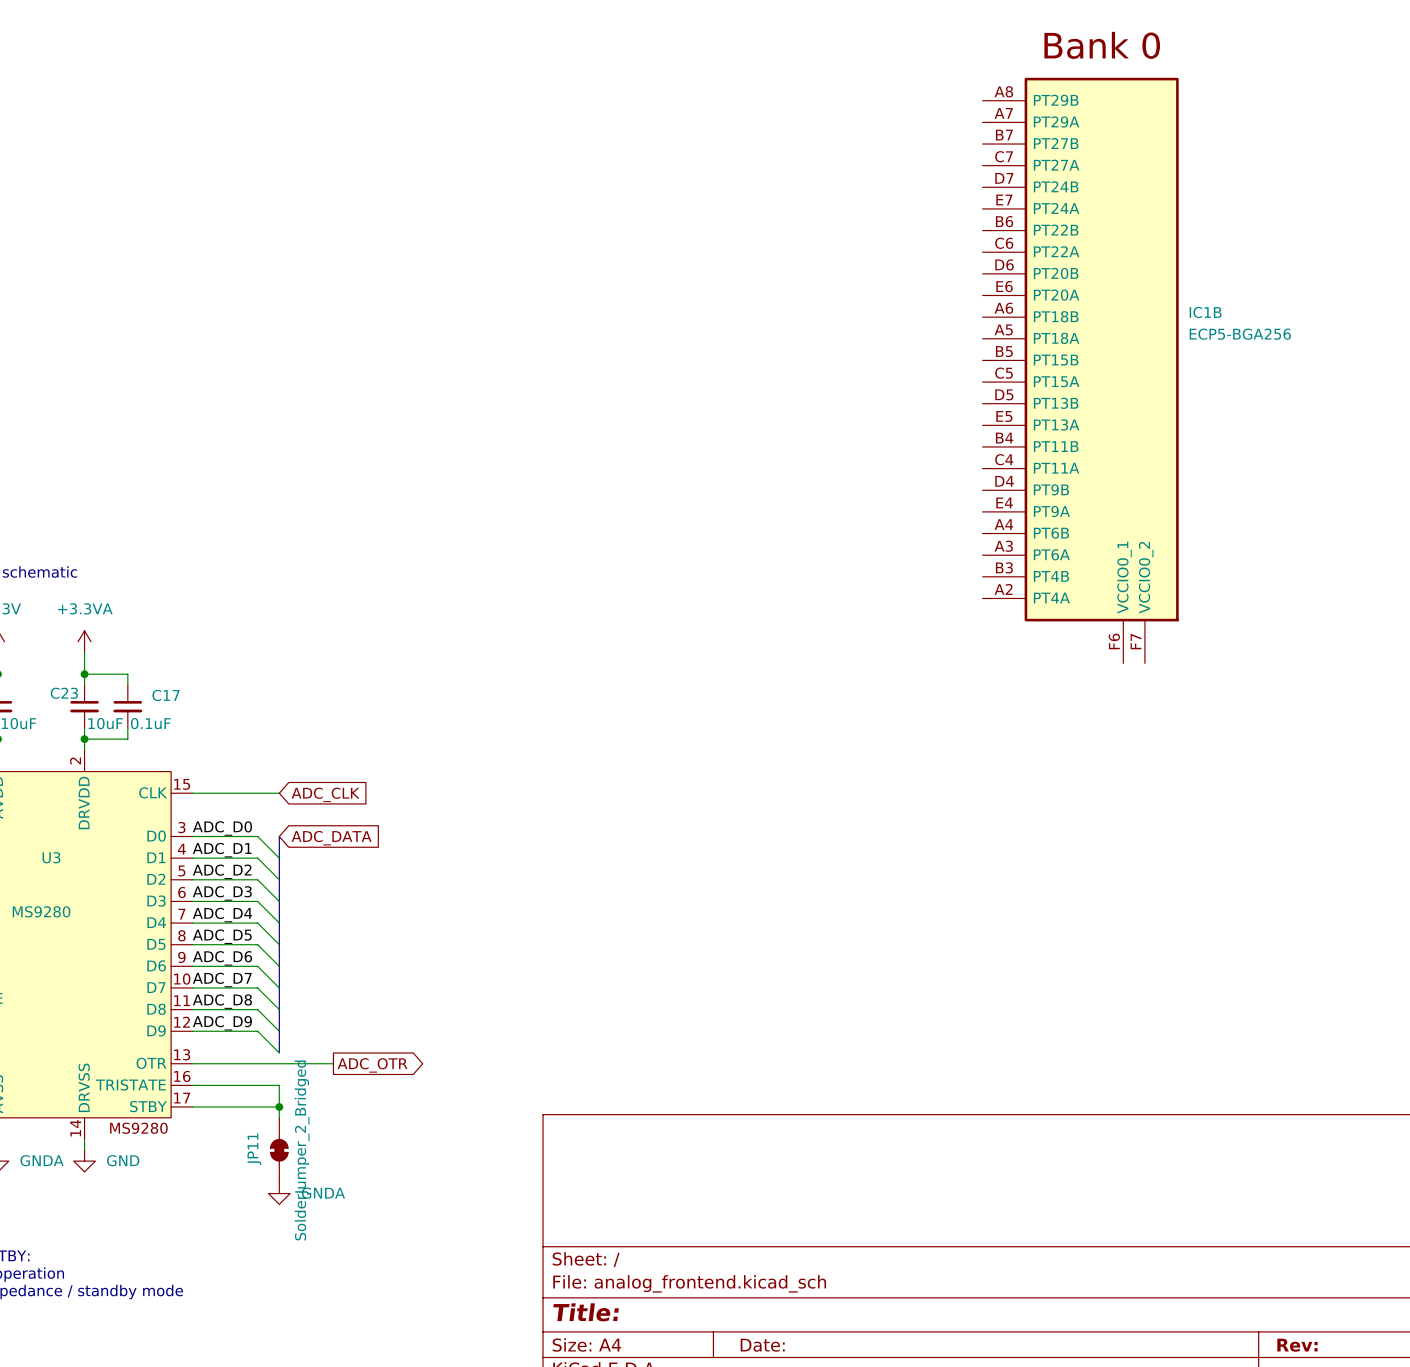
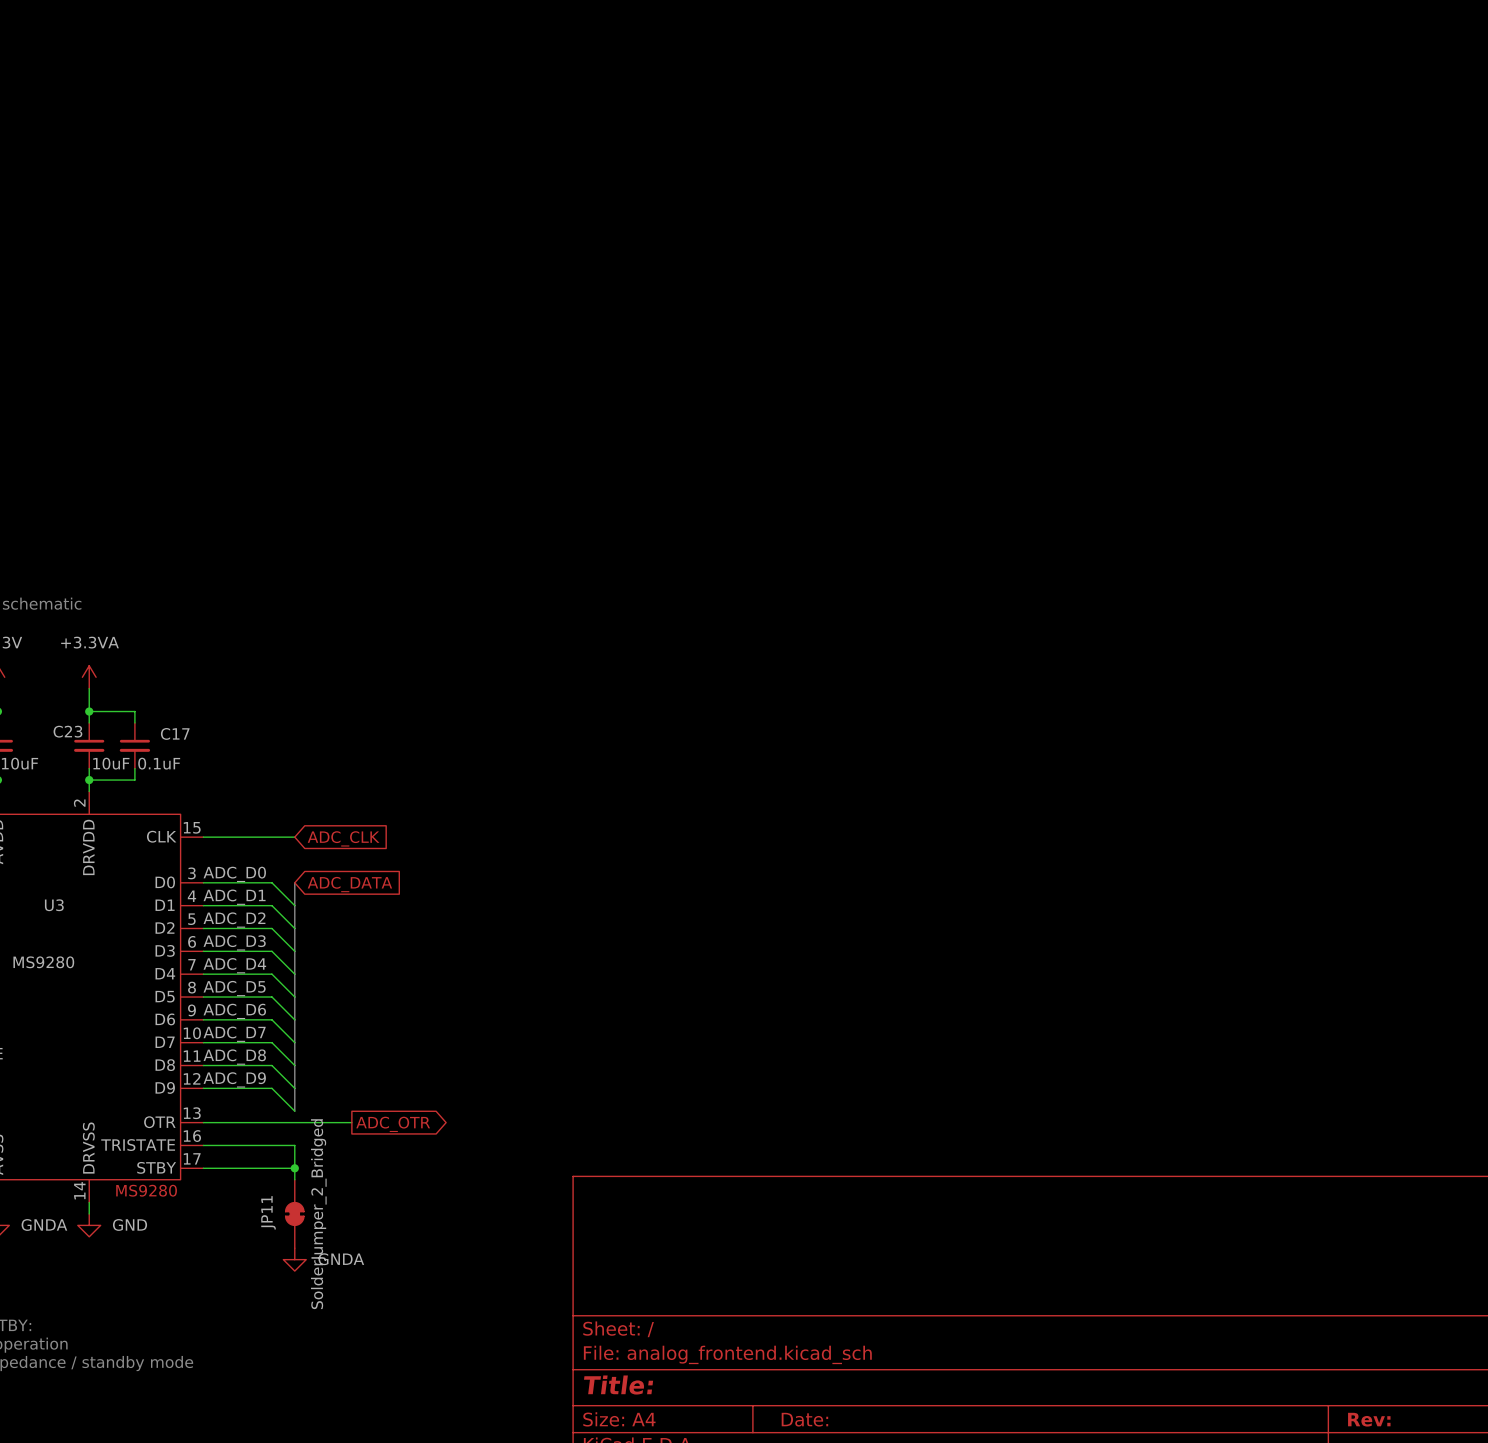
IC1B: ECP5-BGA256 (1080, 370) -> none

